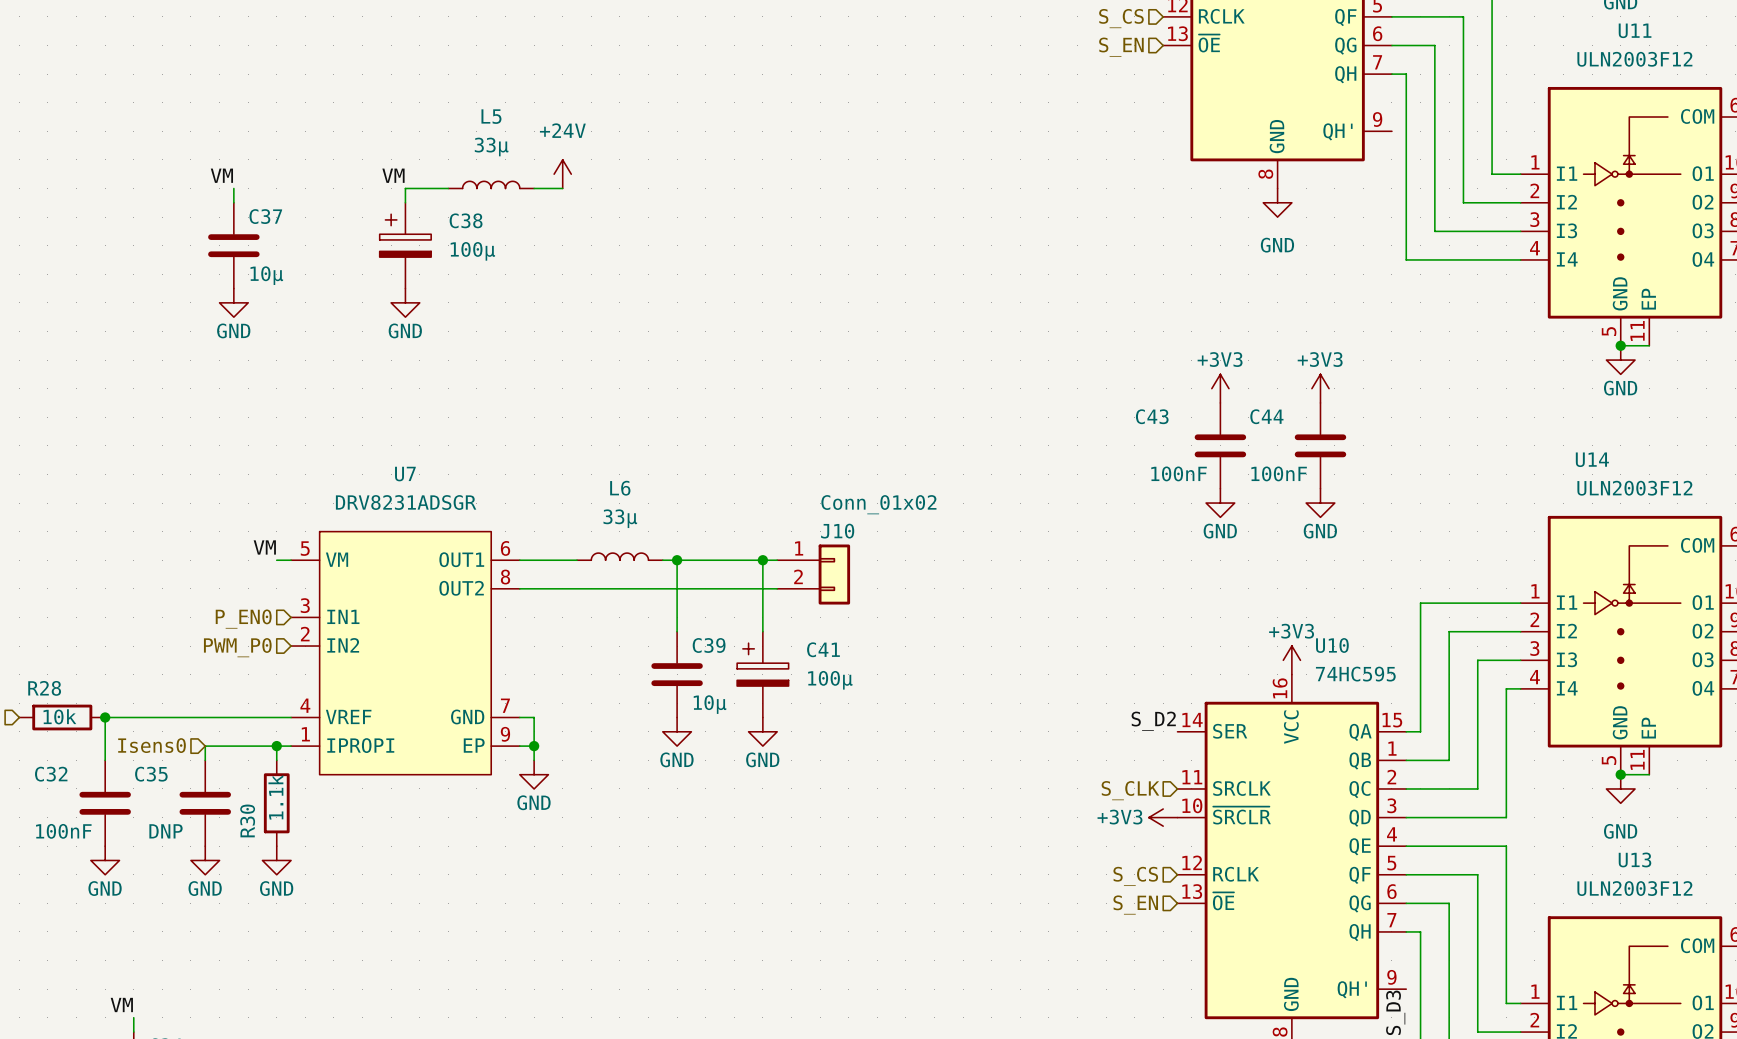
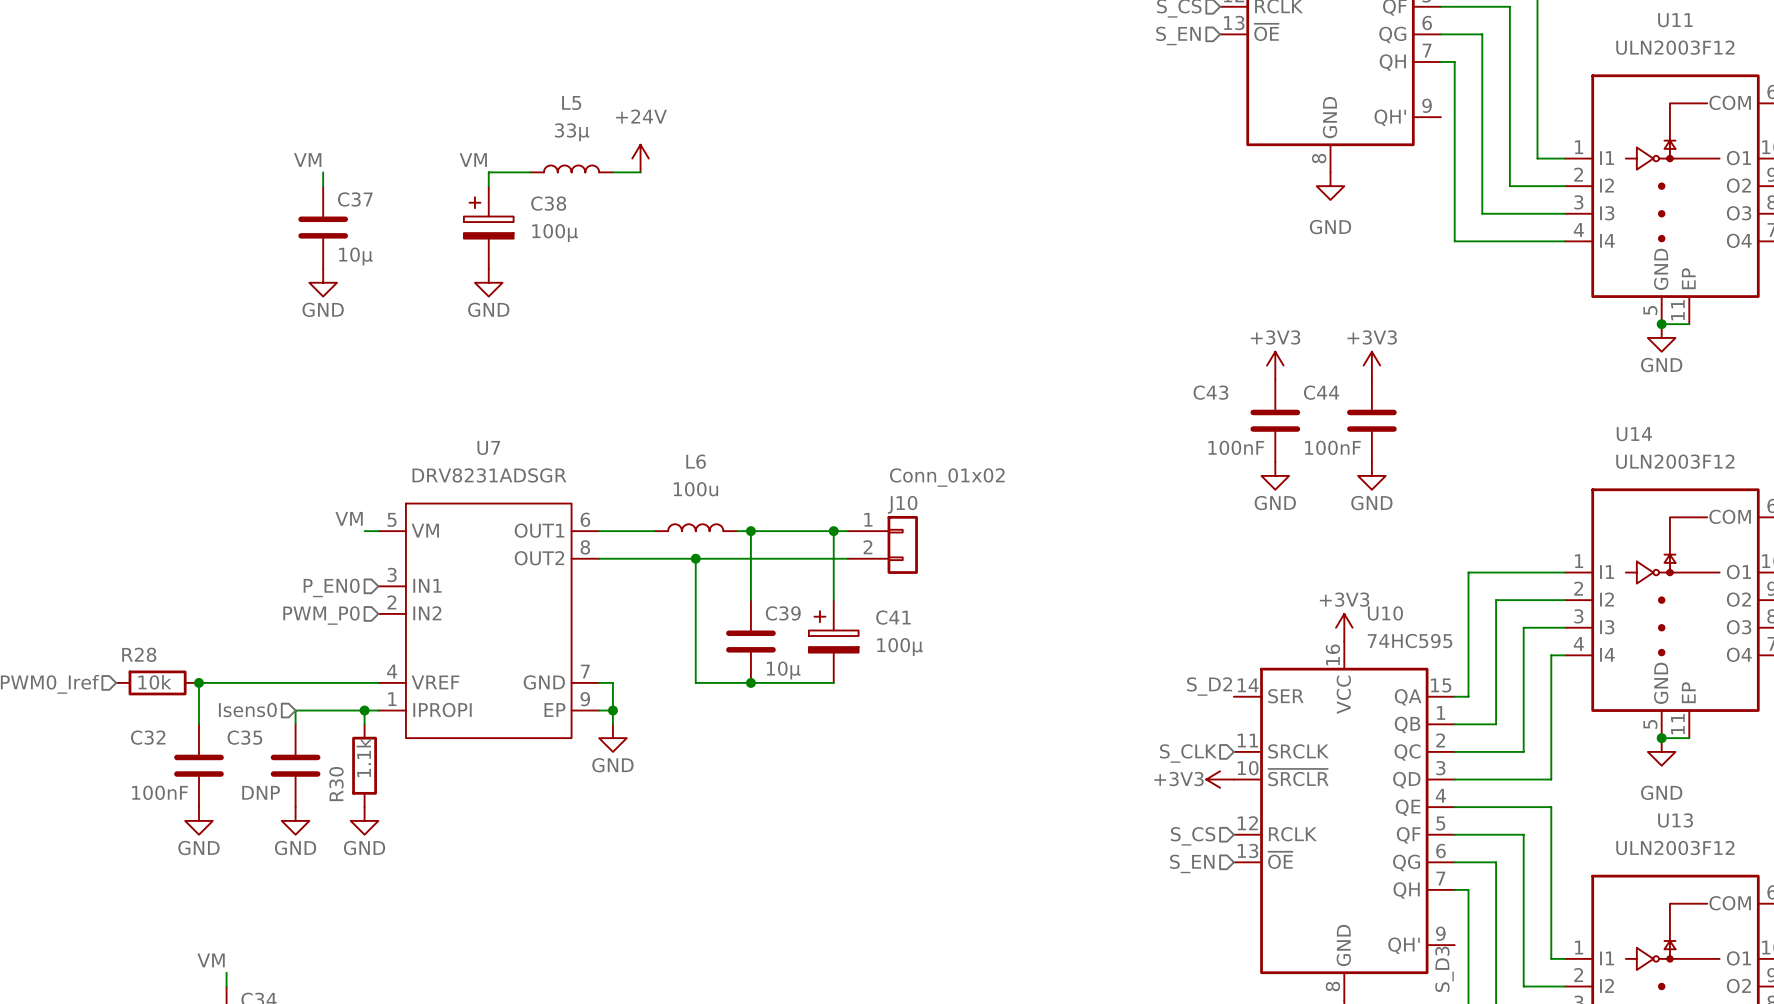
L6 value: 33µ (620, 518) -> 100u (695, 489)
wire: none -> (695, 558) (695, 682) (833, 682)
junction: none -> (695, 558)
junction: none -> (750, 682)
power symbol: GND (677, 731) -> none
power symbol: GND (762, 731) -> none

